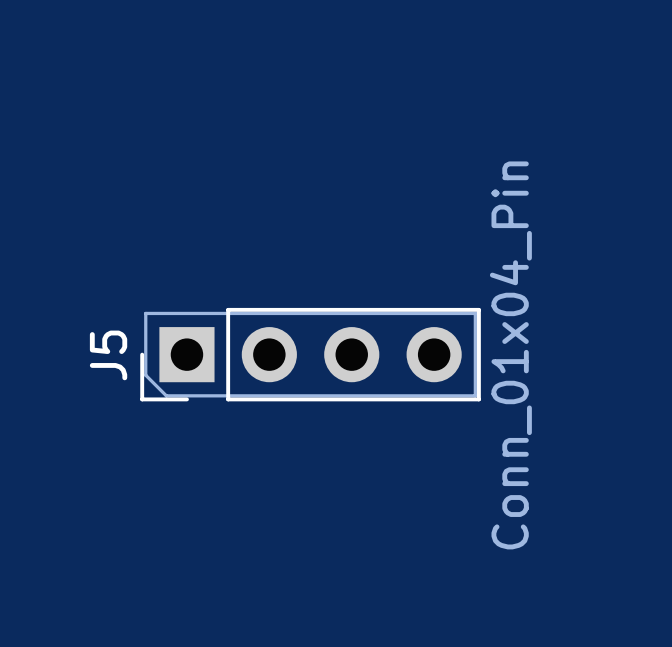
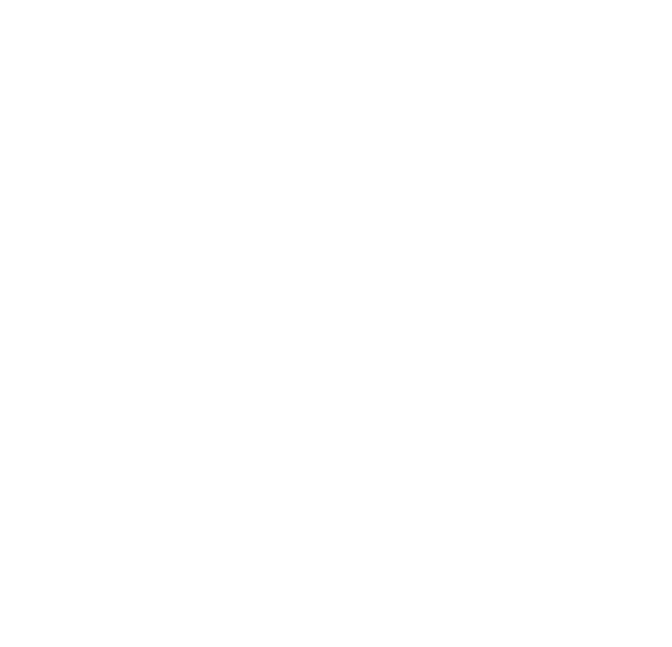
J5: Conn_01x04_Pin (310, 354) -> none

